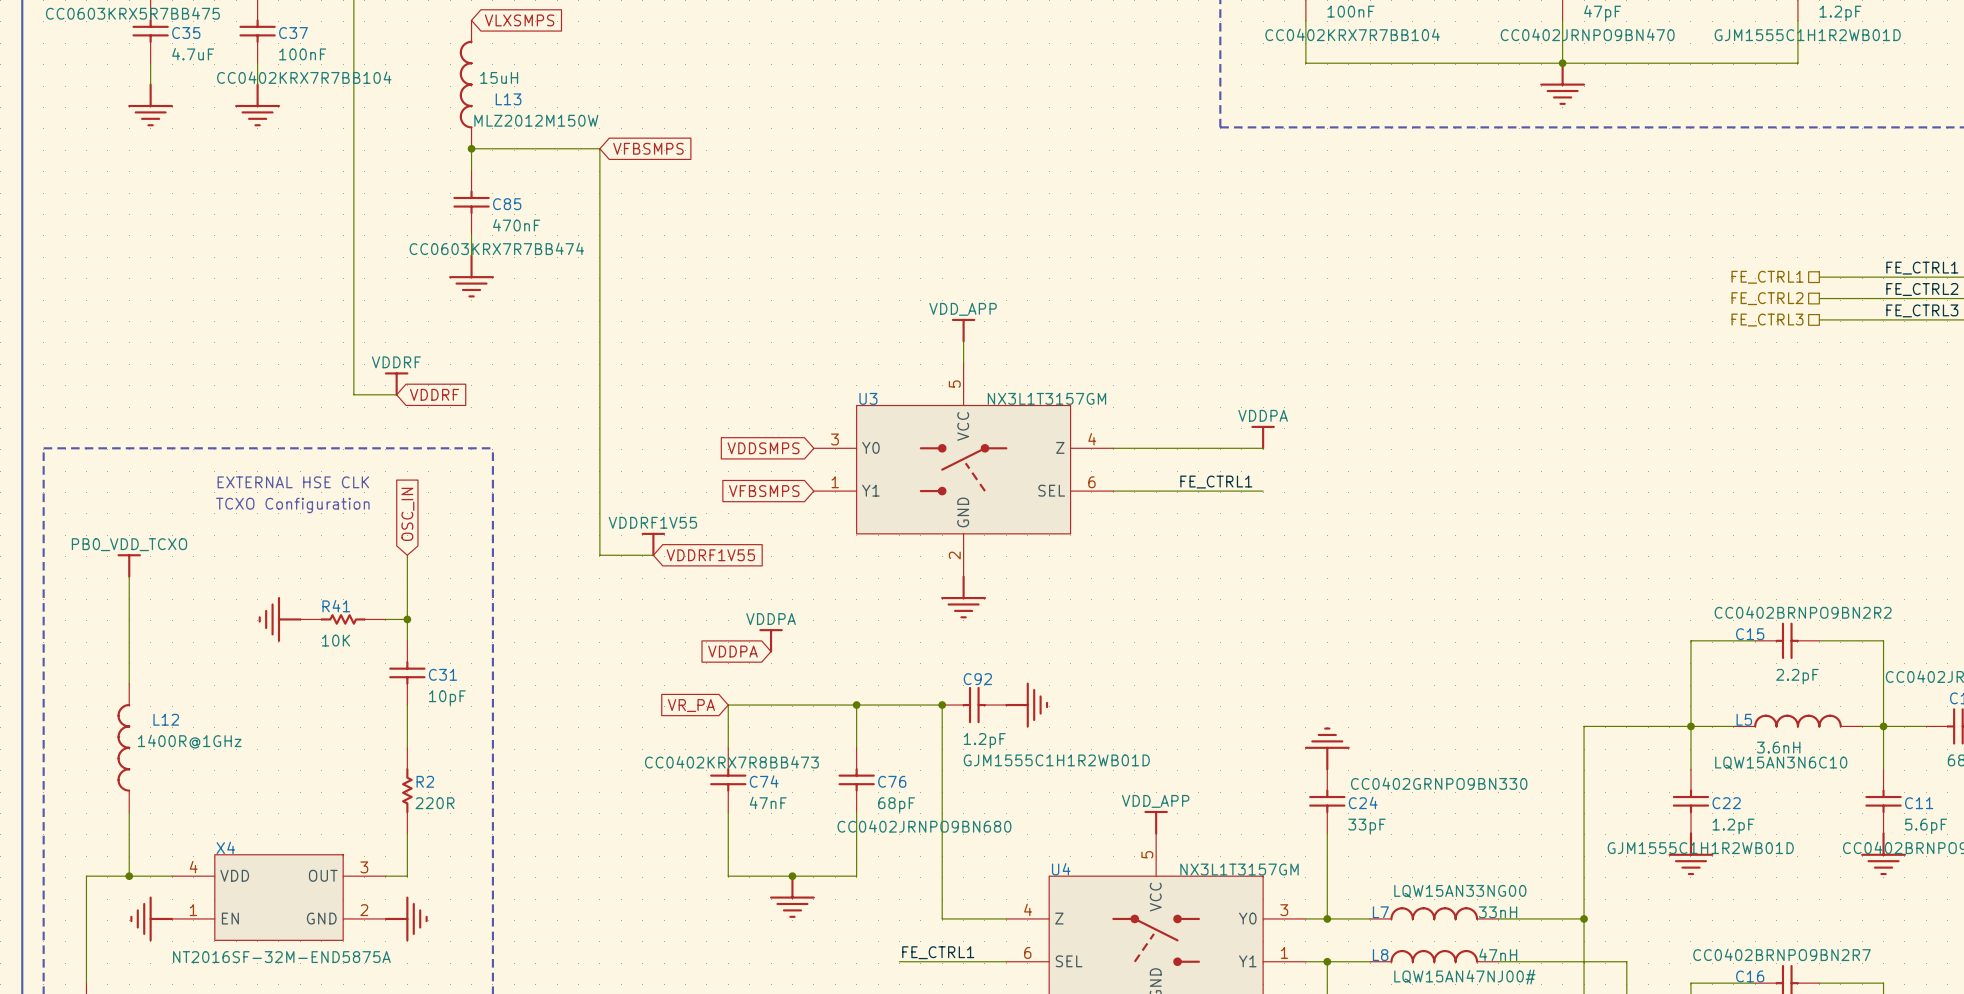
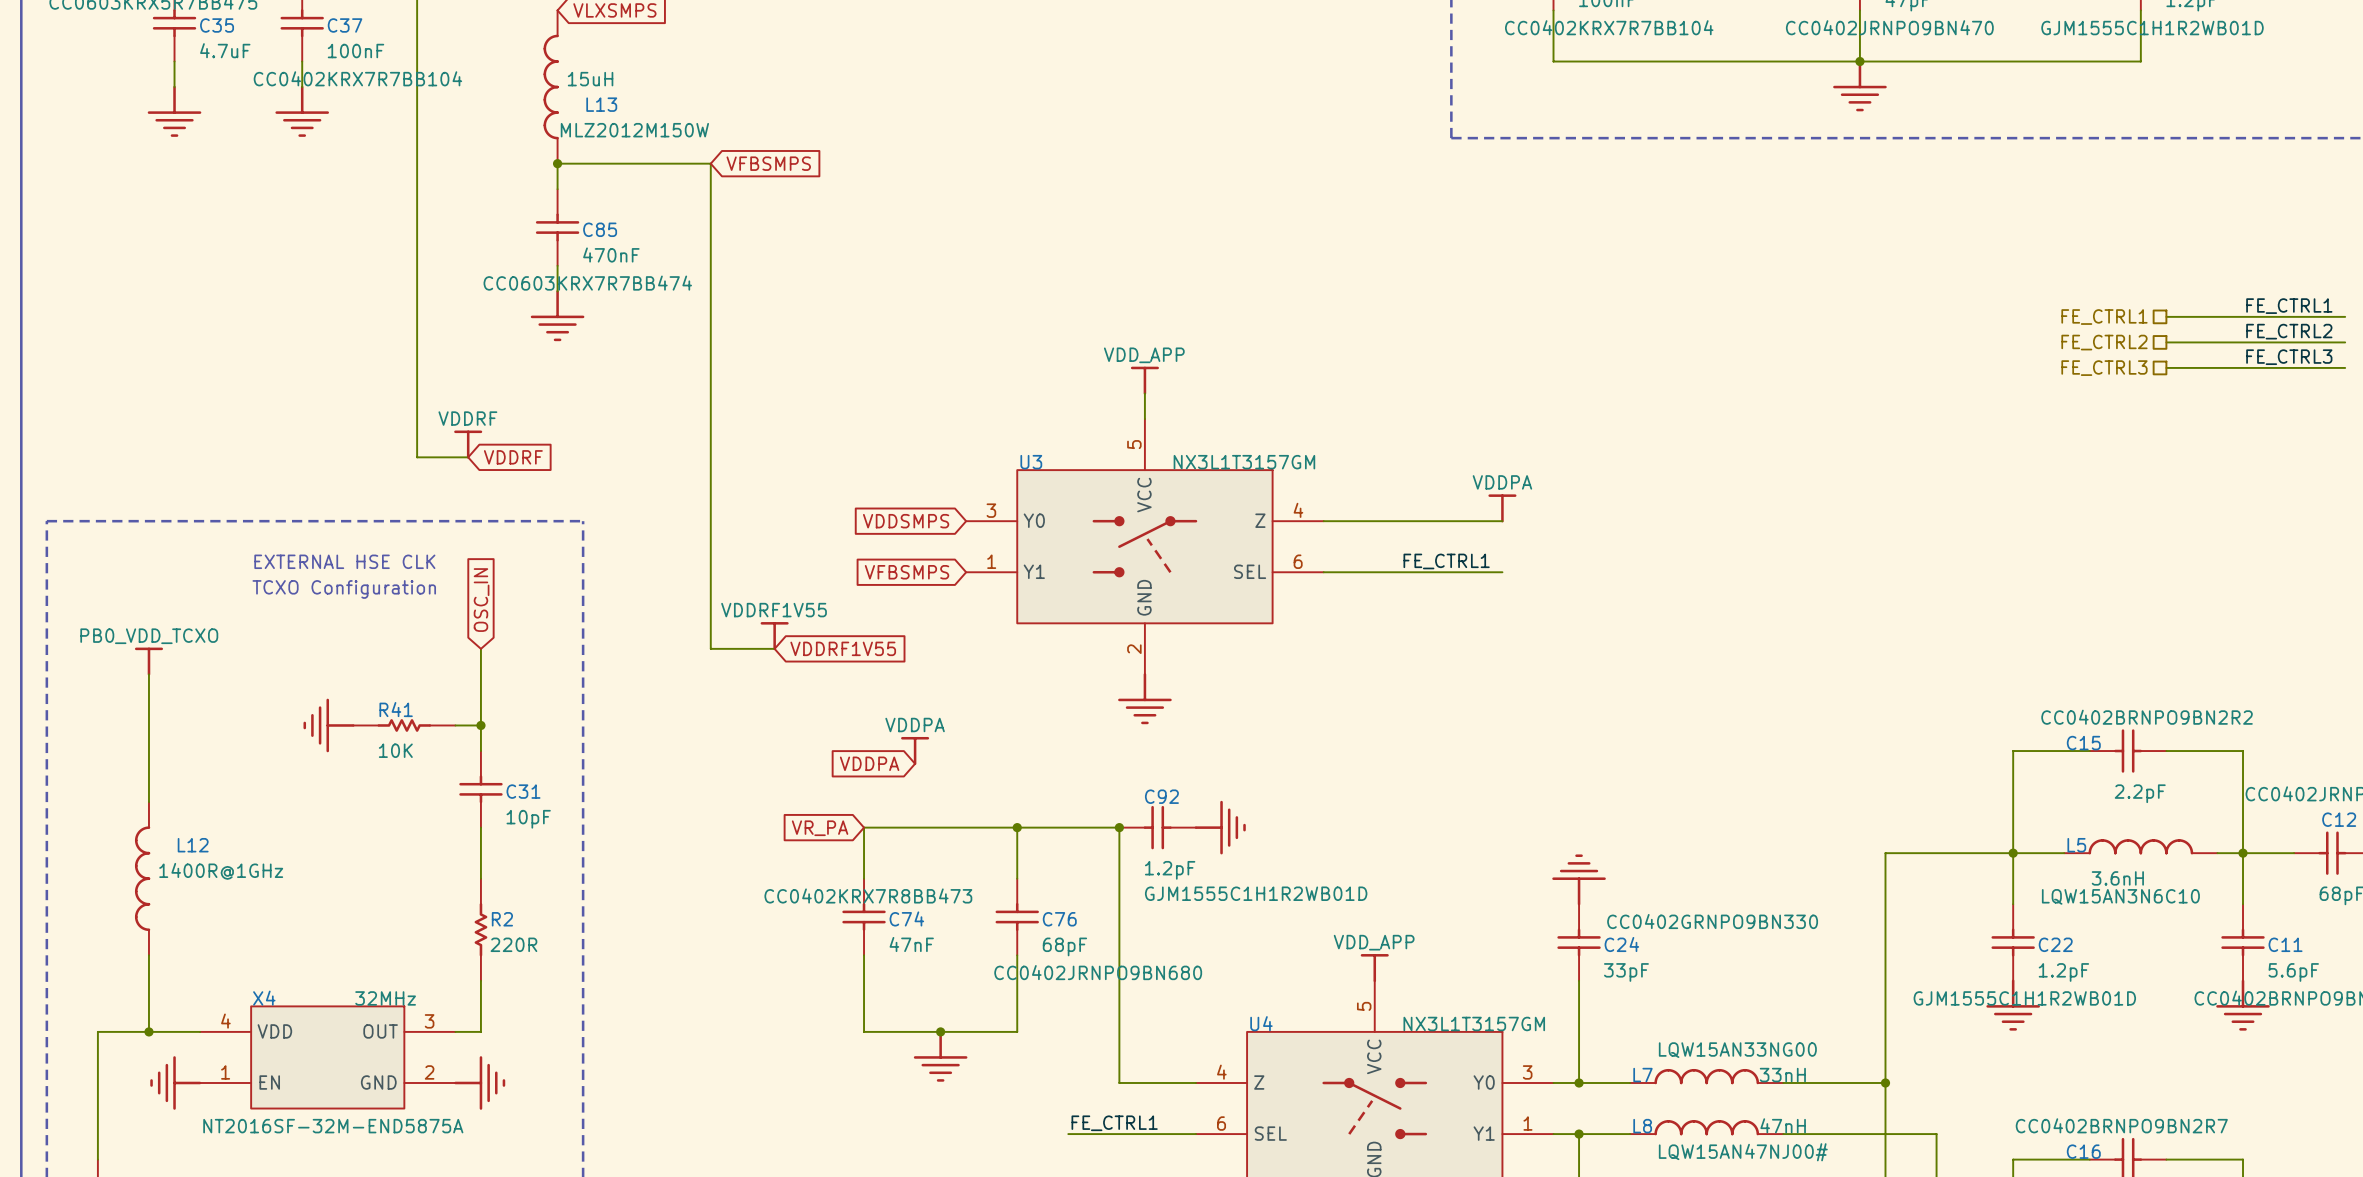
X4 text: none -> 32MHz (385, 998)
X4 text: none -> NT2016SF-32M-END5875A (333, 1126)
X4 text: NT2016SF-32M-END5875A (281, 957) -> none

